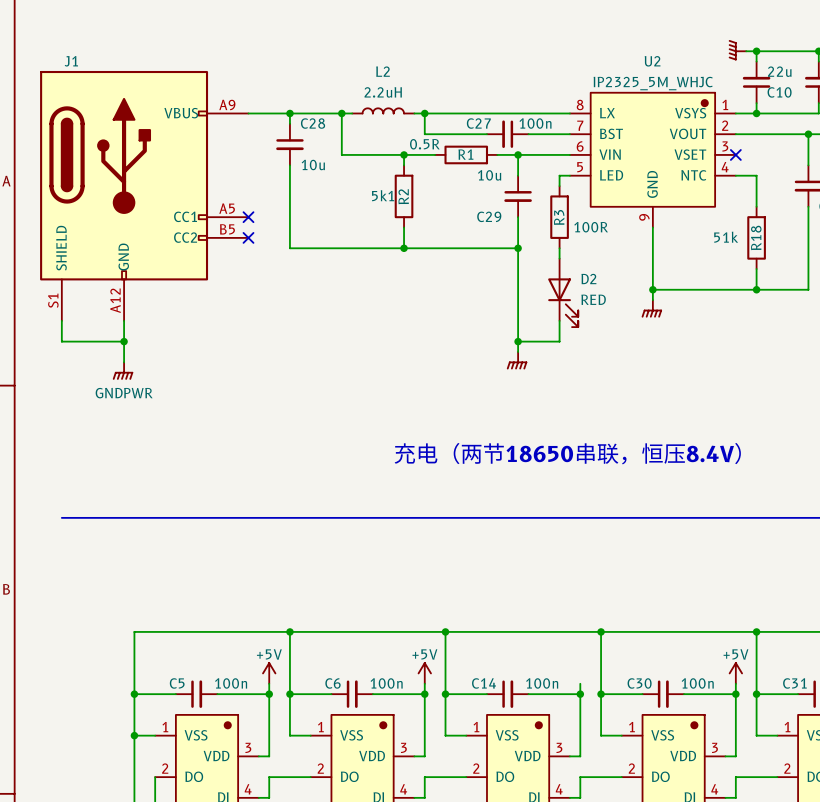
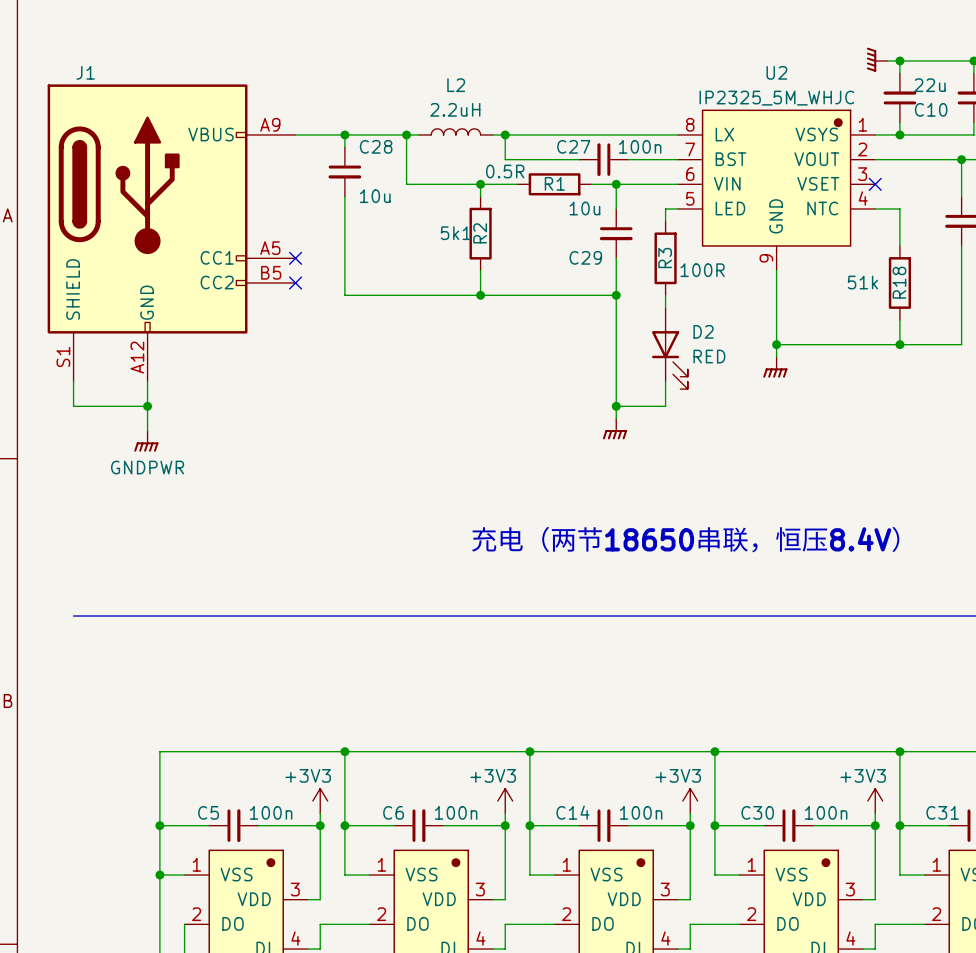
power symbol: +5V (269, 673) -> +3V3 (320, 801)
power symbol: +5V (424, 673) -> +3V3 (505, 801)
power symbol: none -> +3V3 (690, 801)
power symbol: +5V (735, 673) -> +3V3 (875, 801)

